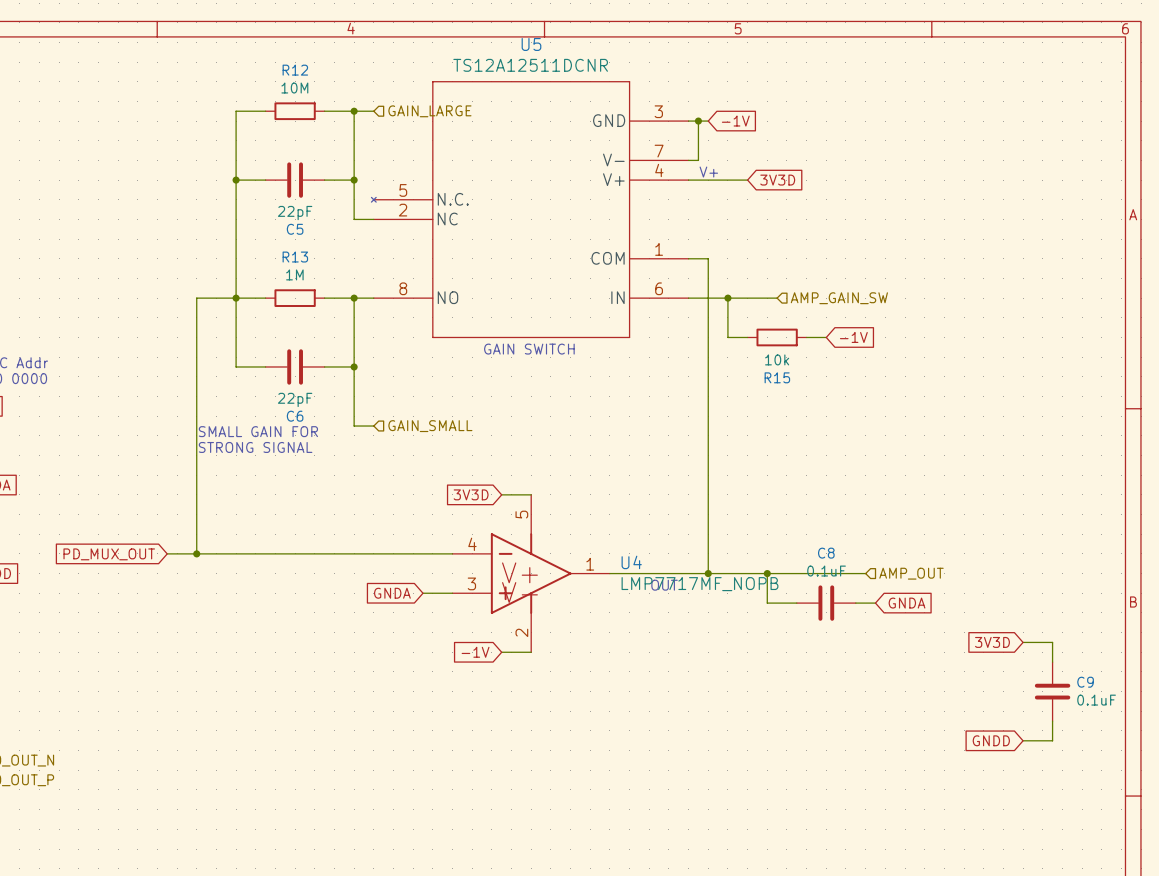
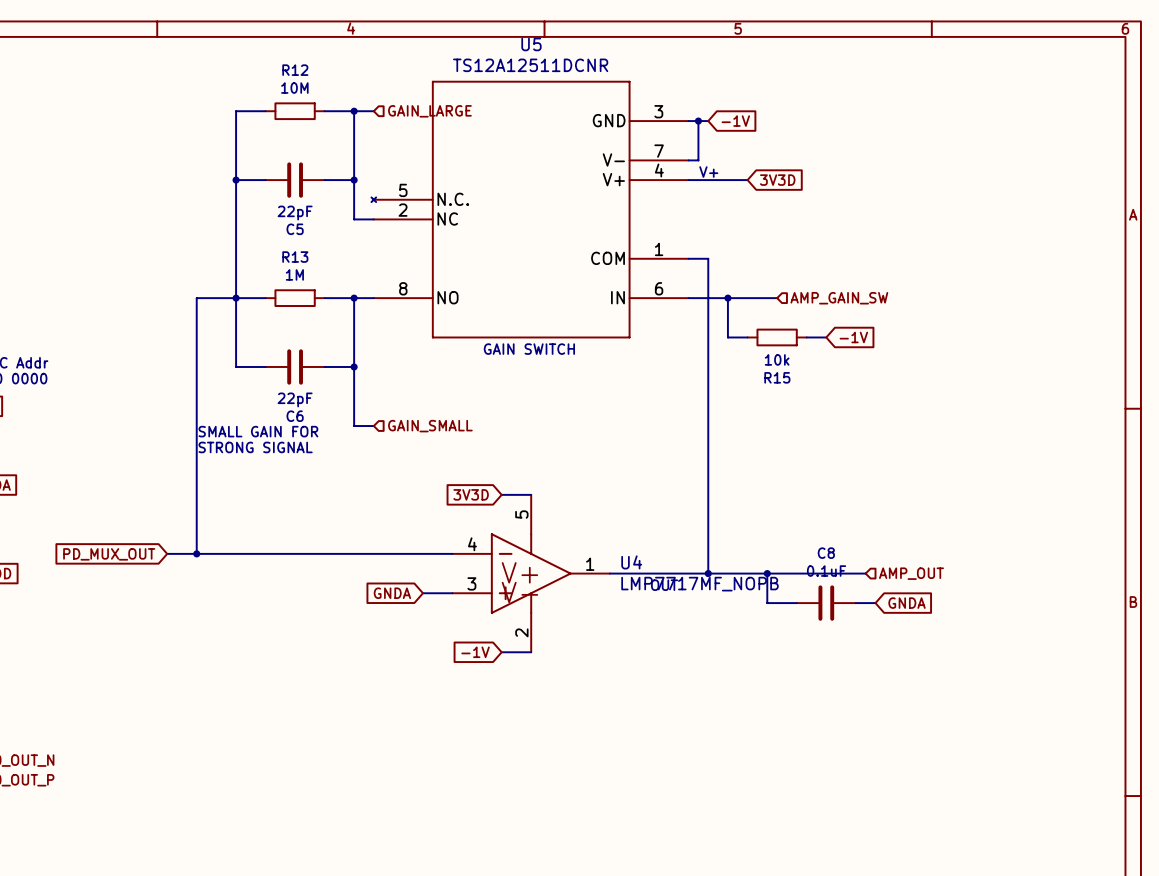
global label: 3V3D (992, 642) -> none
wire: (1023, 642) (1052, 642) (1052, 662) -> none
C9: 0.1uF (1052, 691) -> none
wire: (1052, 721) (1052, 740) (1023, 740) -> none
global label: GNDD (991, 740) -> none

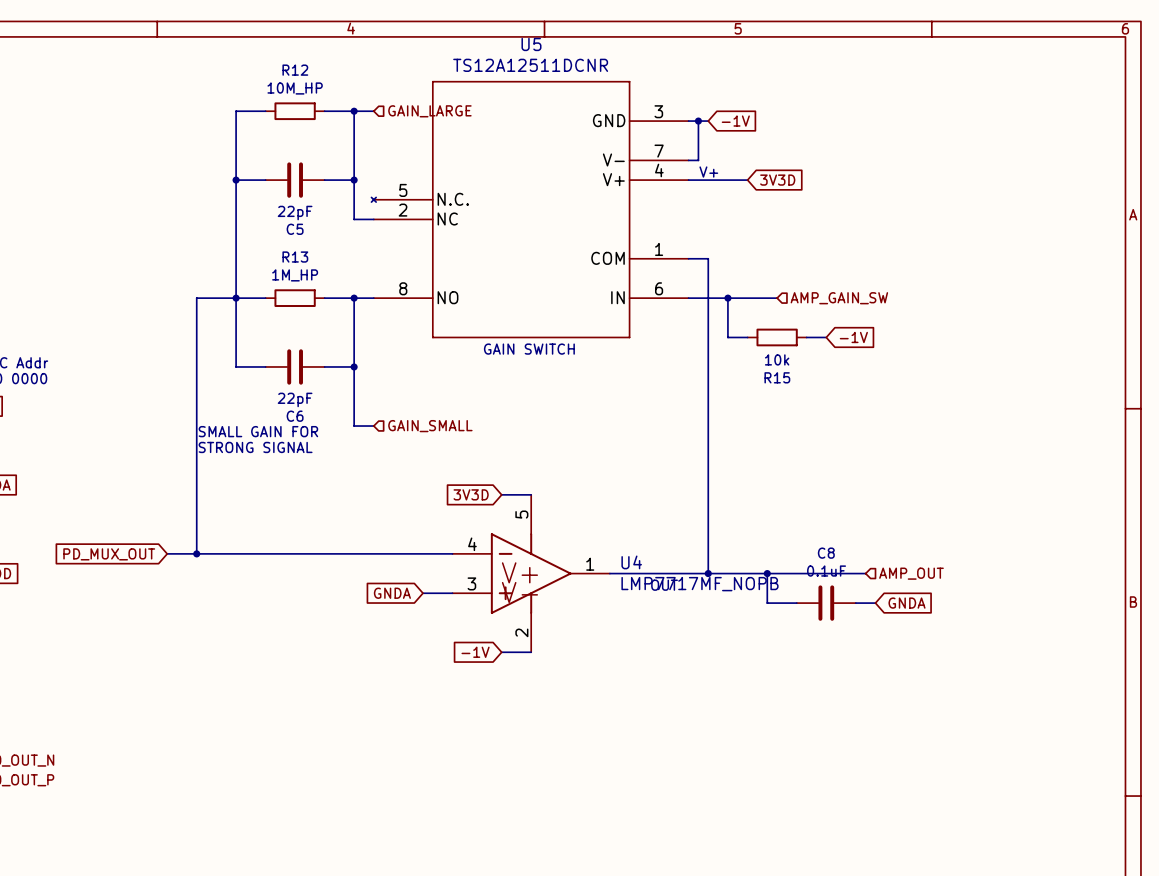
R12 value: 10M (294, 88) -> 10M_HP (295, 88)
R13 value: 1M (294, 274) -> 1M_HP (295, 275)

